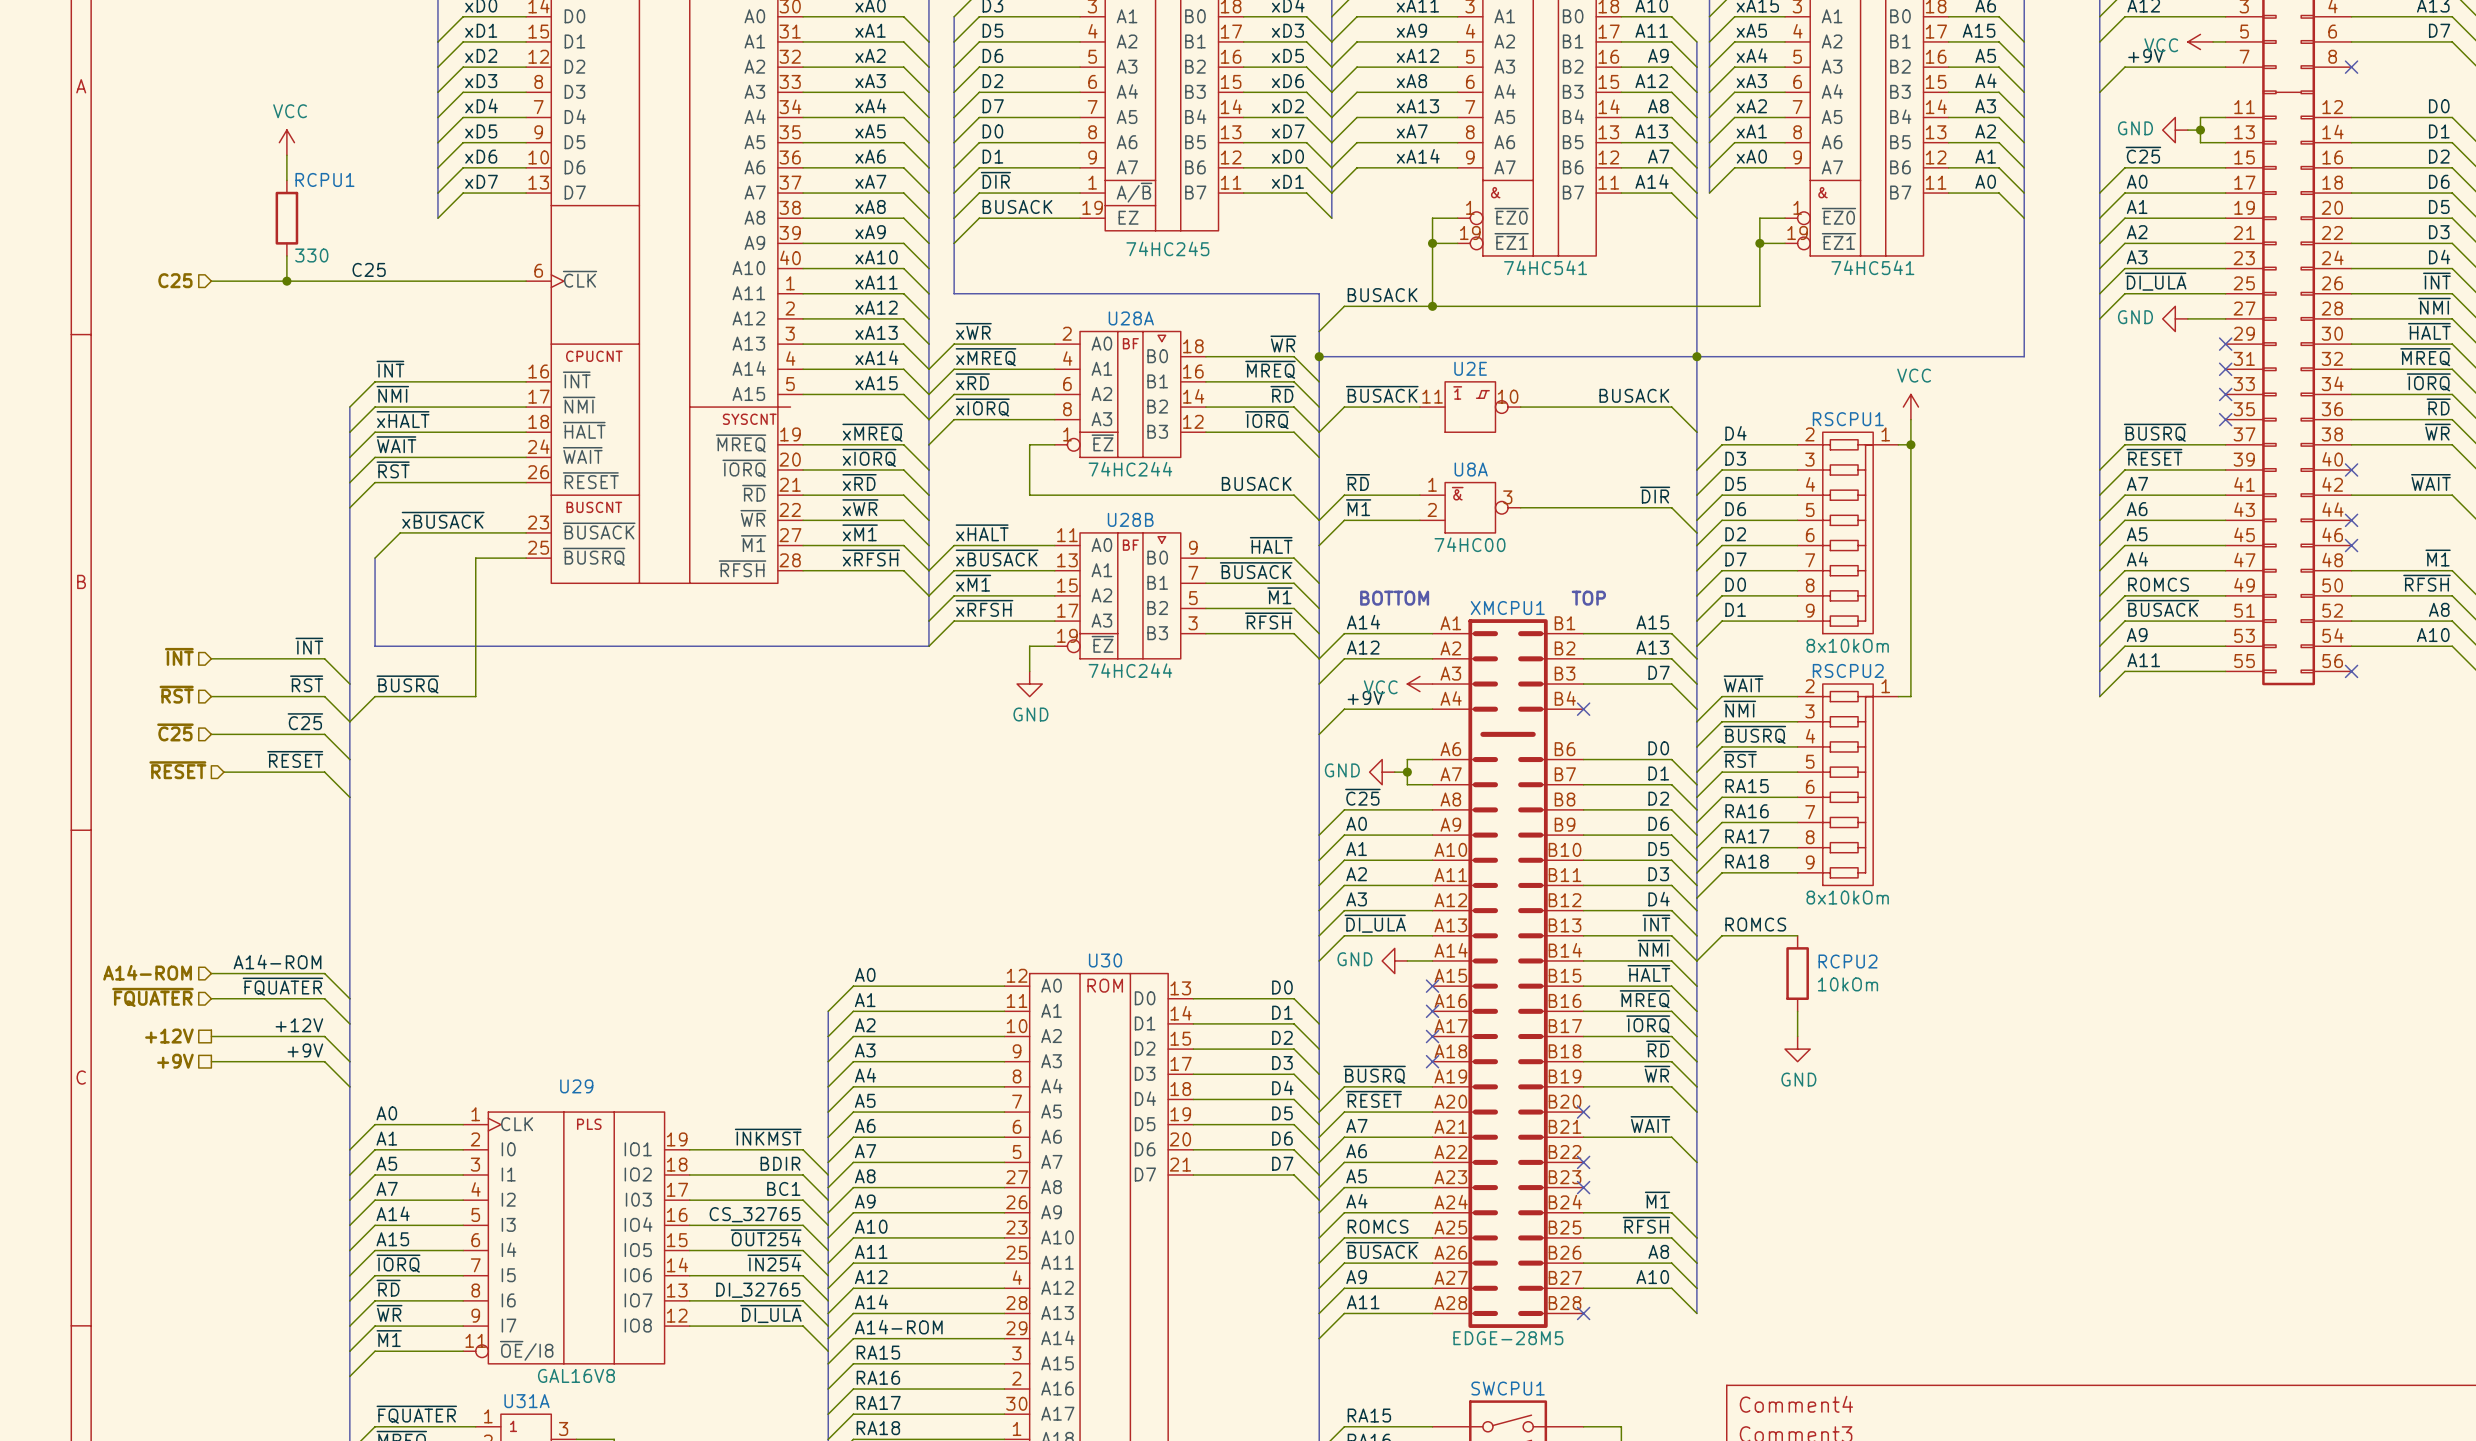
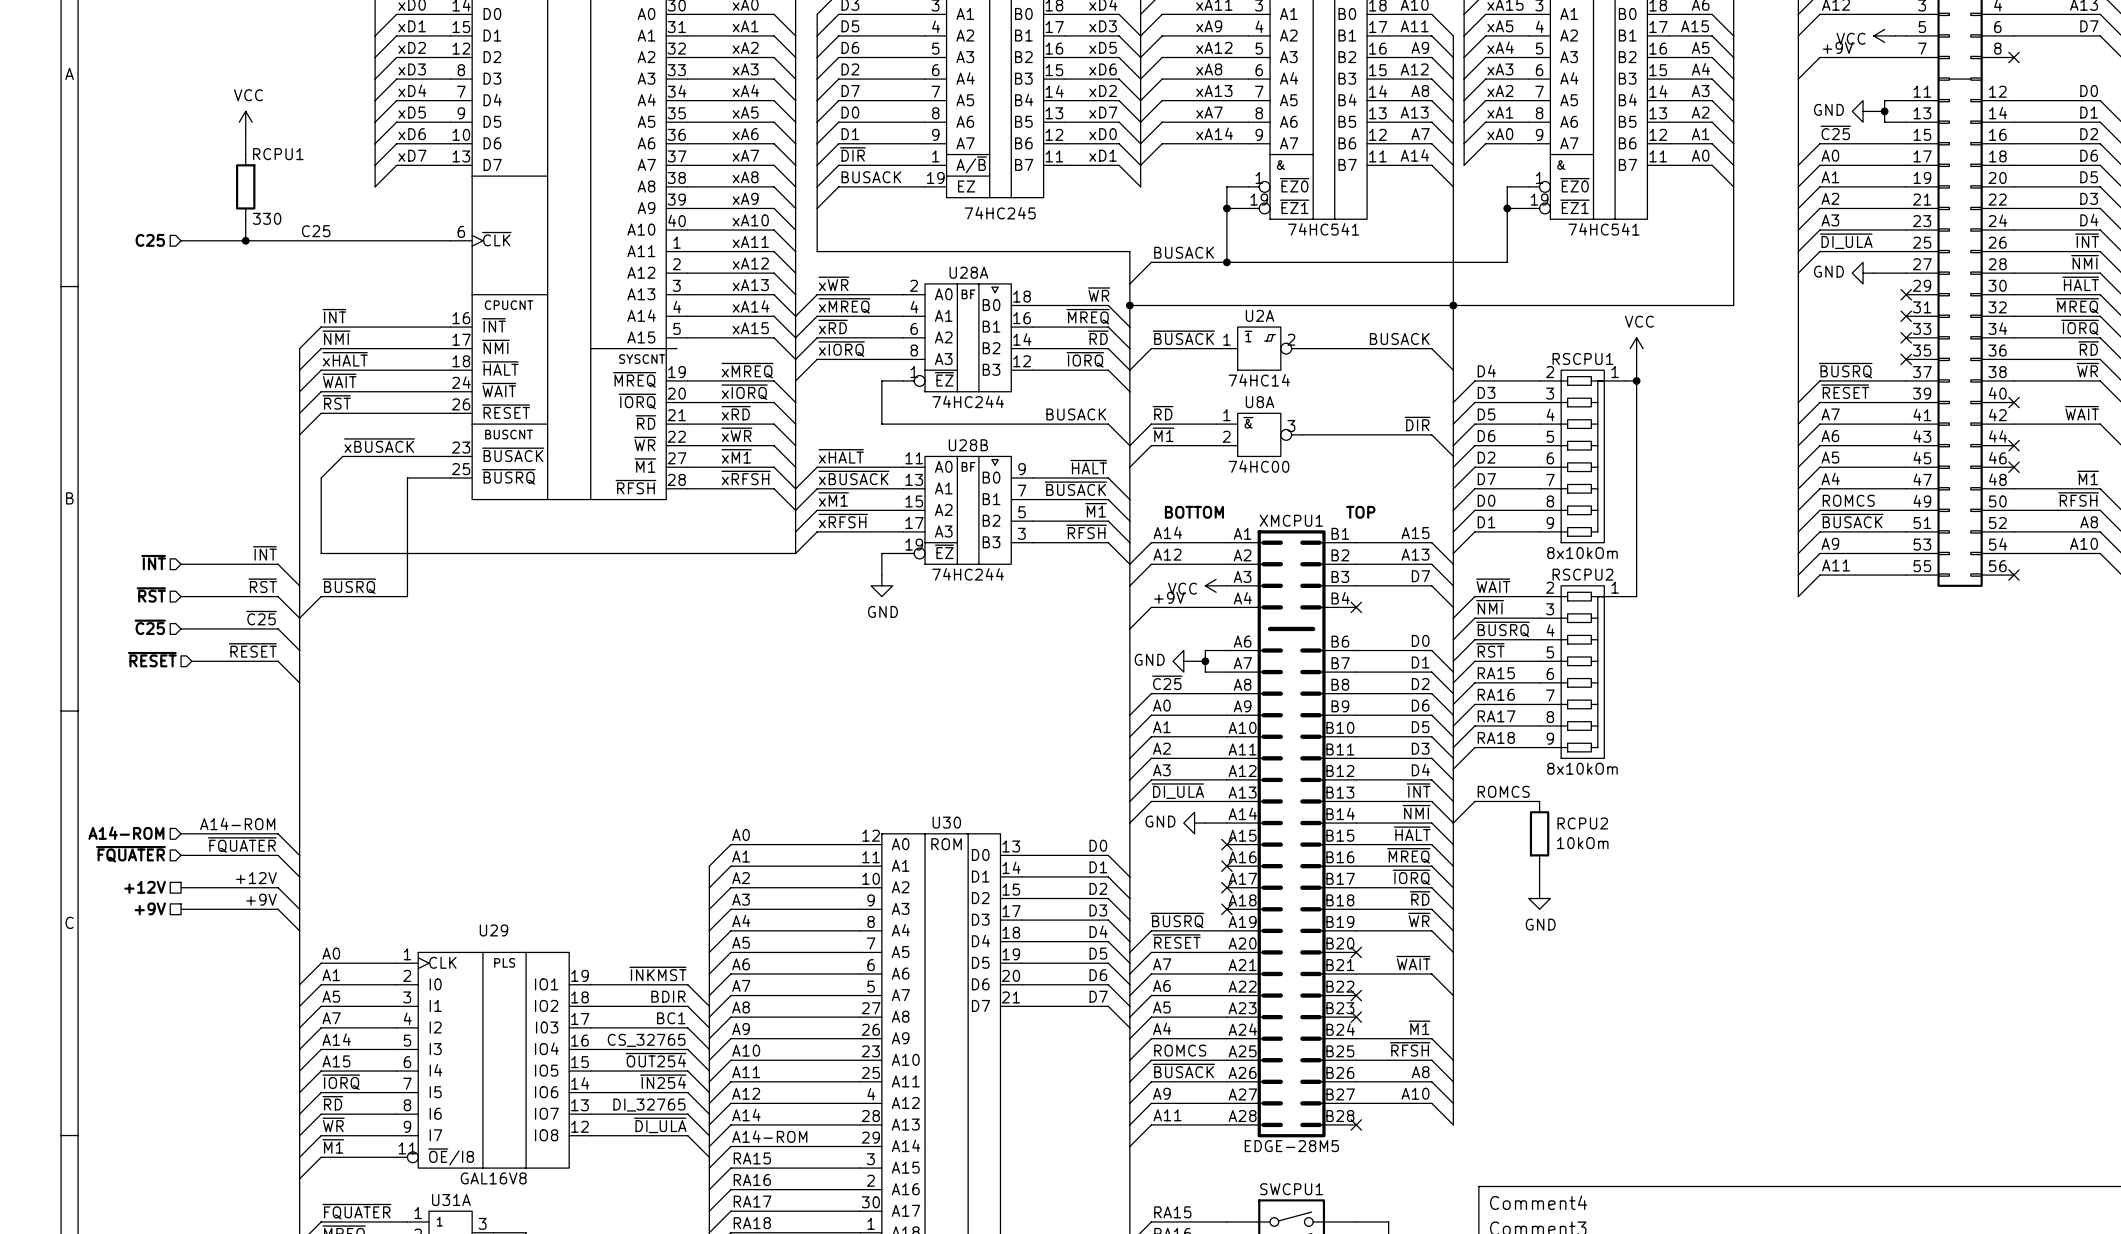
U2E name: U2E (1470, 368) -> U2A (1260, 315)
U2E pin number: 11 (1432, 396) -> 1 (1226, 339)
U2E pin number: 10 (1508, 396) -> 2 (1291, 339)
U2E value: none -> 74HC14 (1259, 380)

